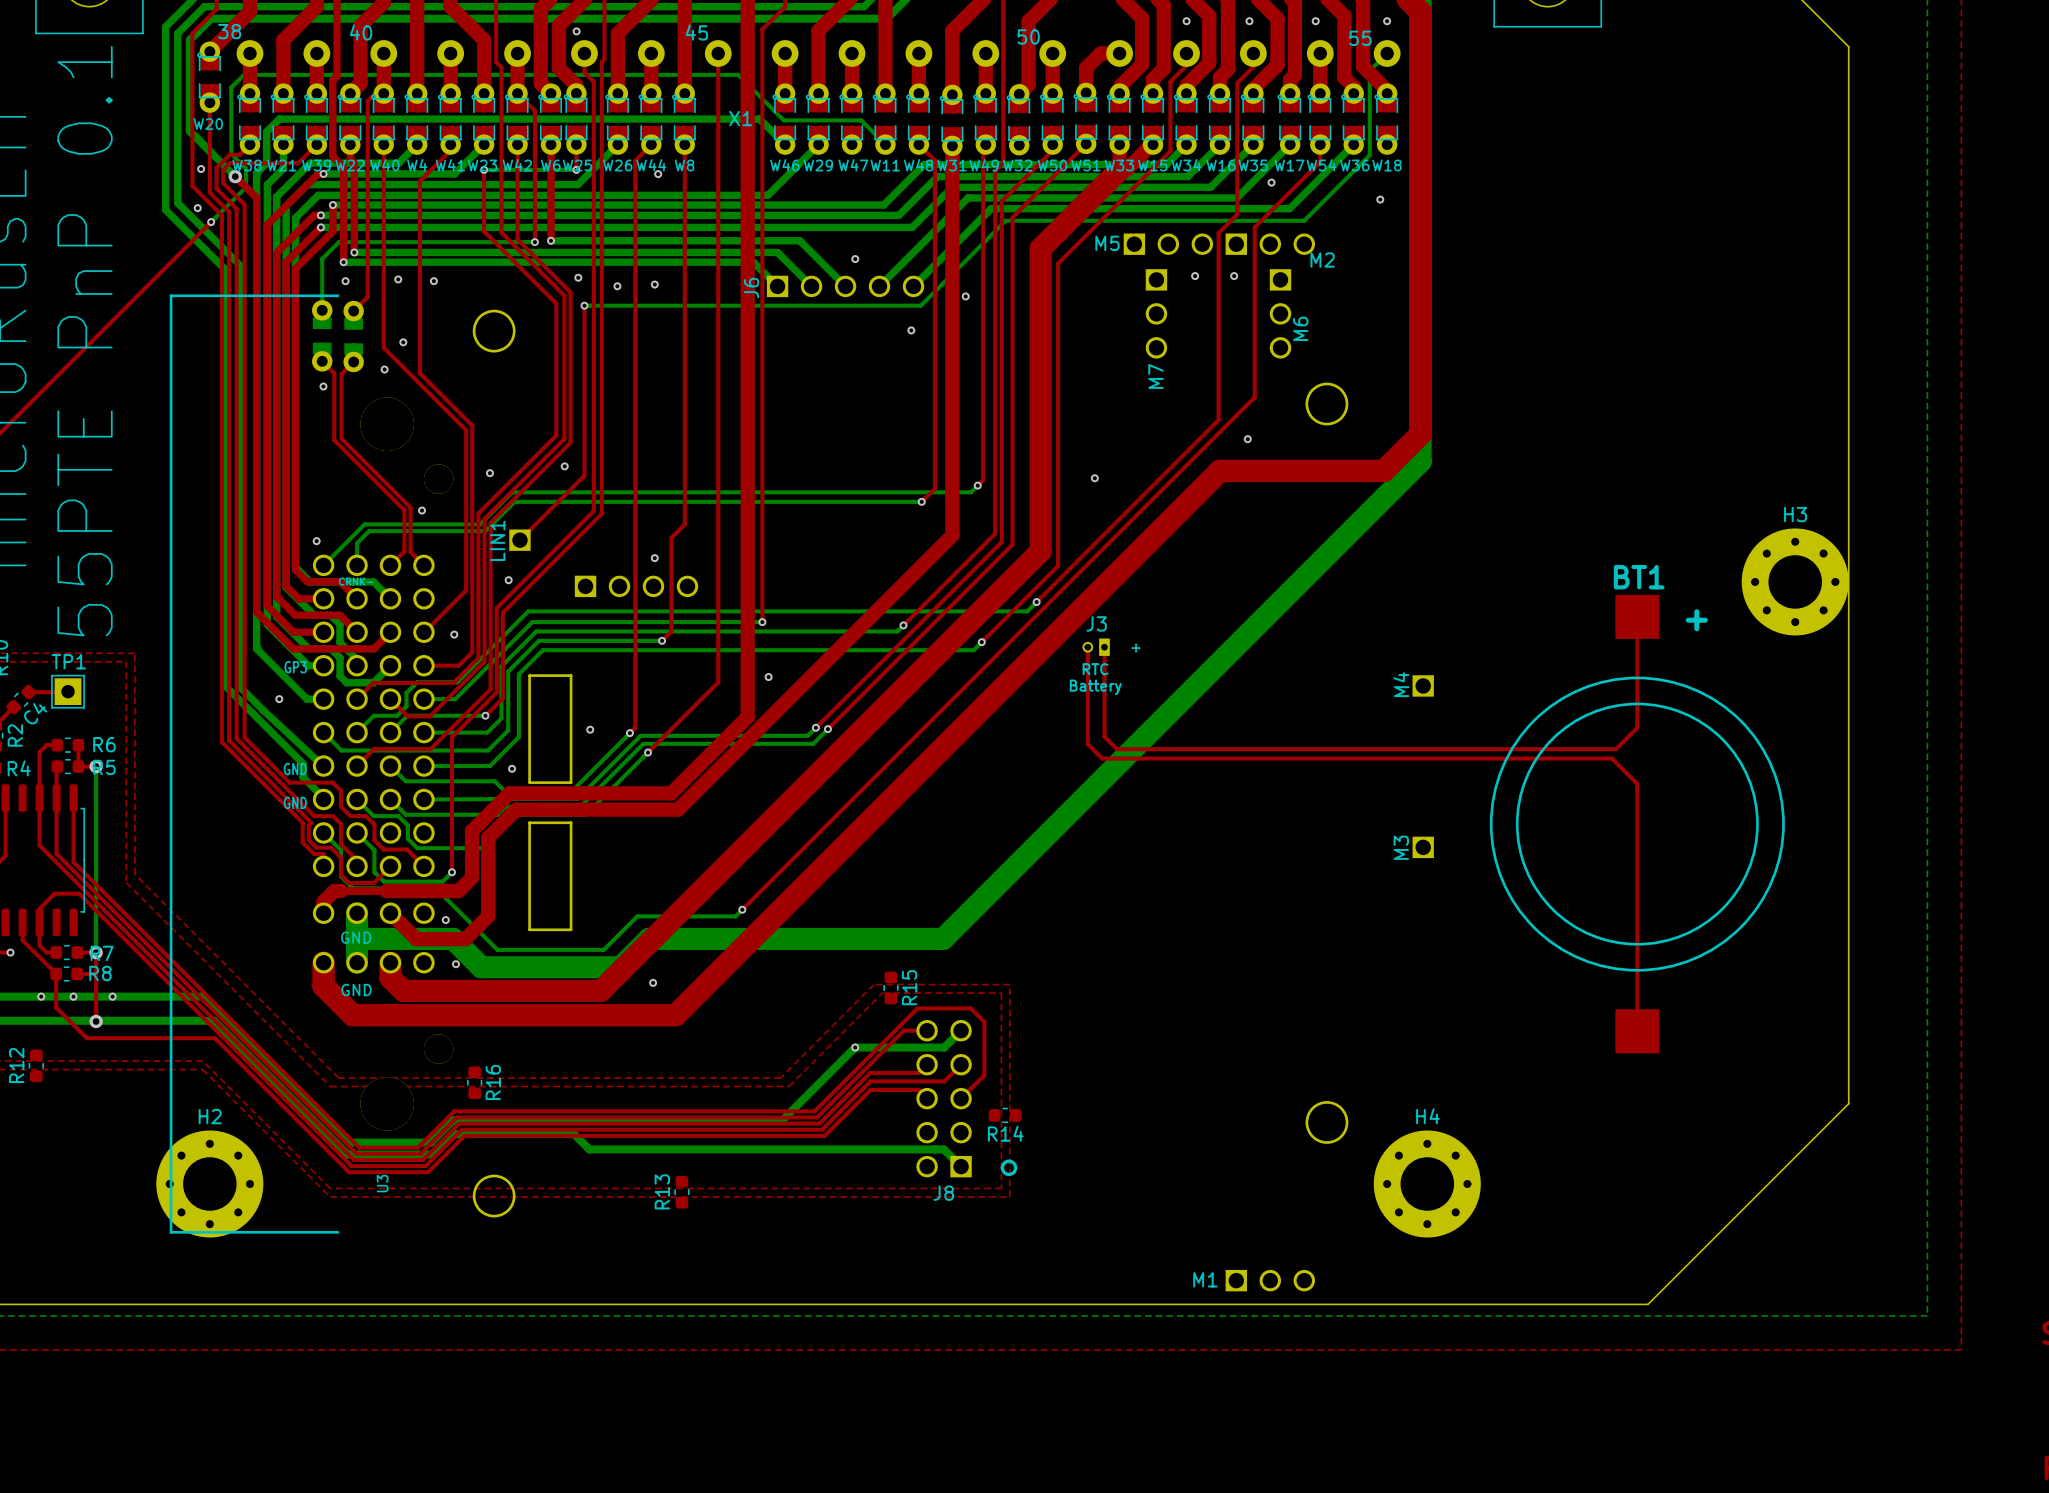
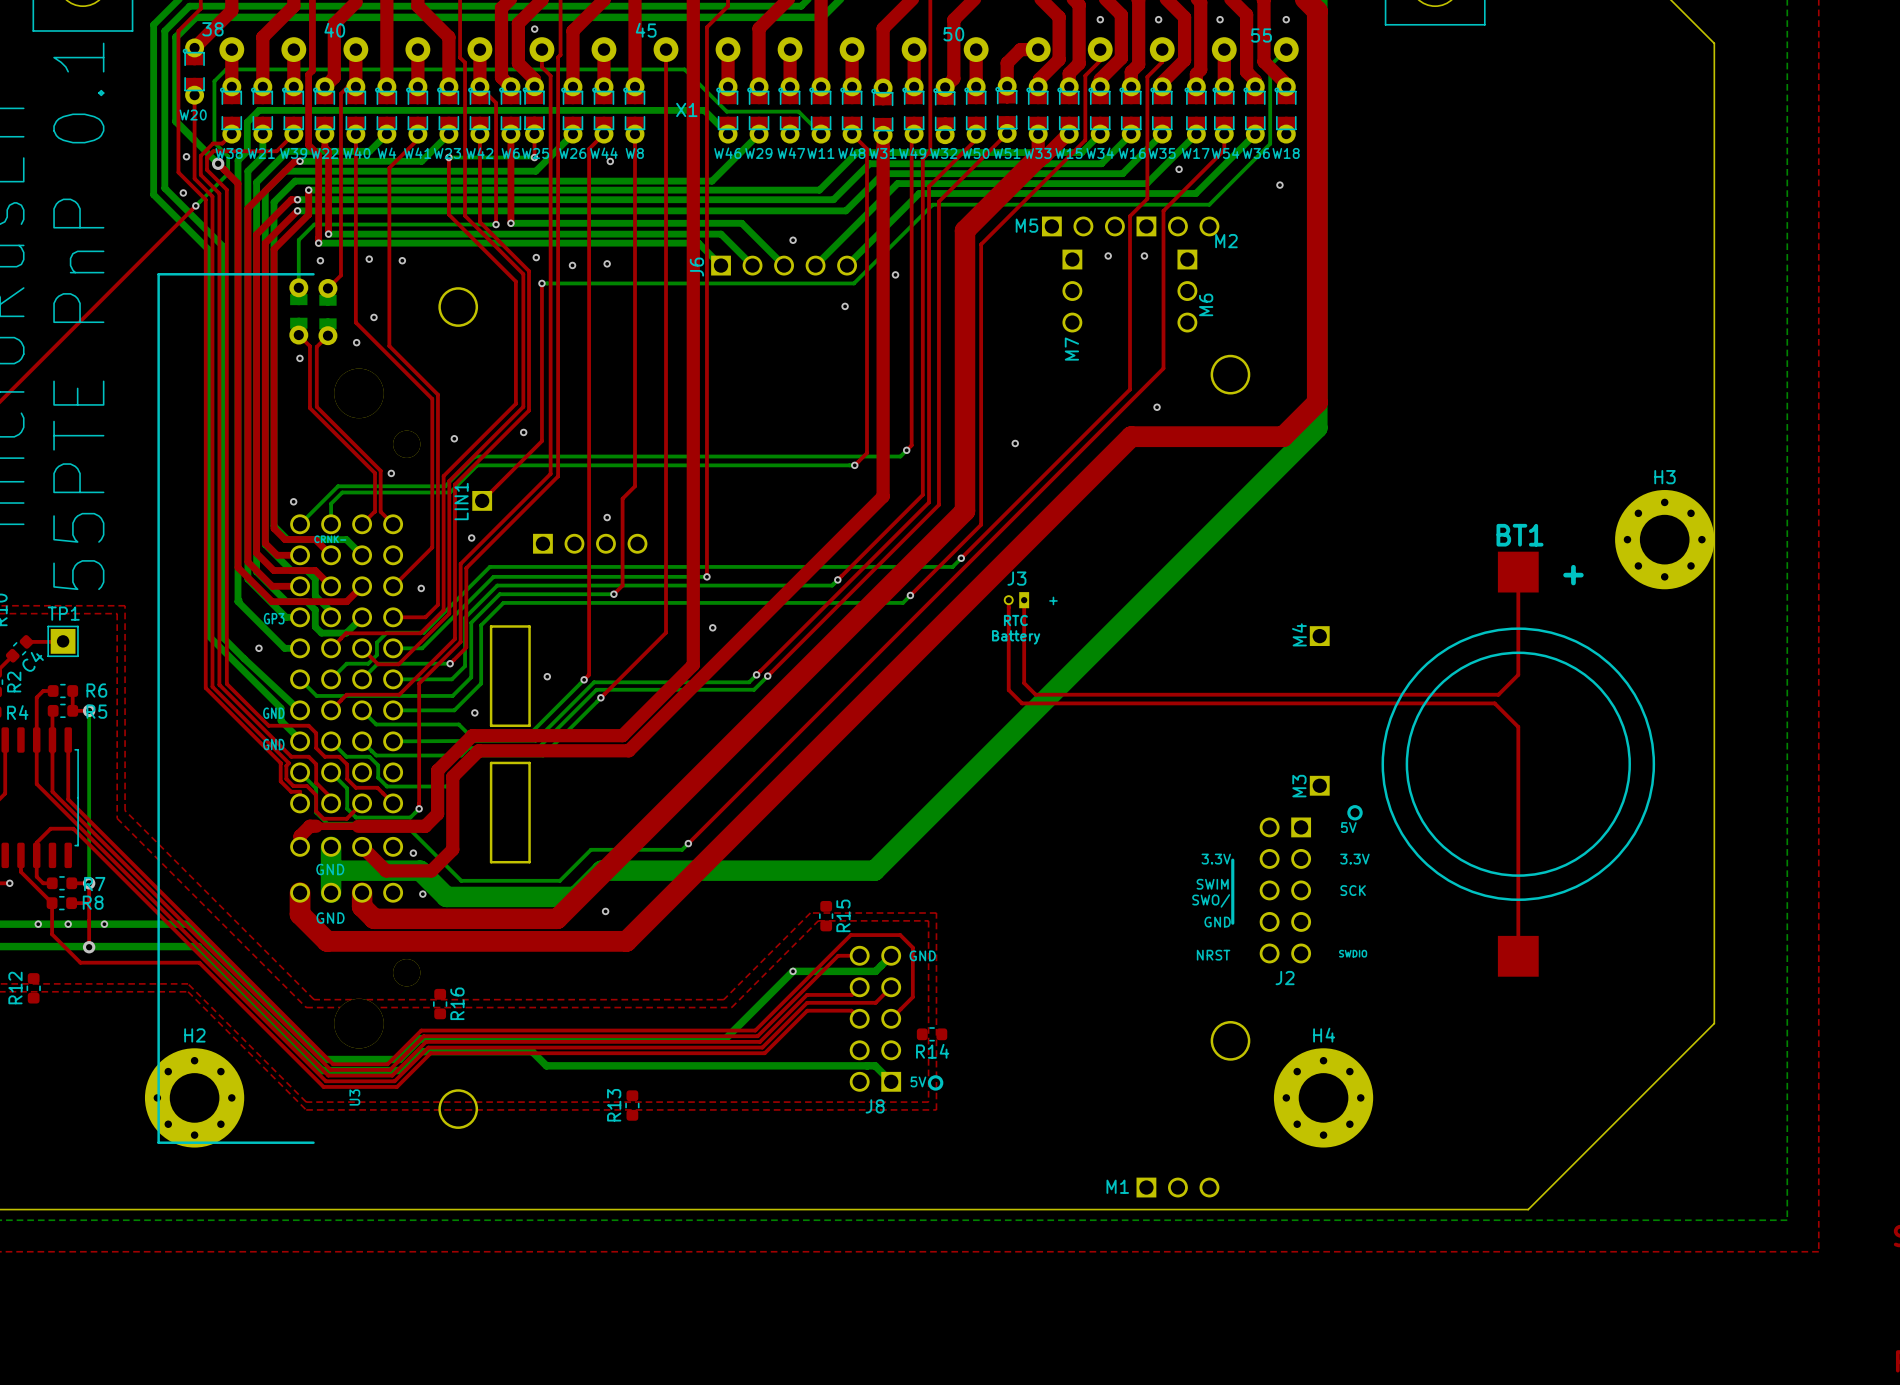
U3 footprint: [169, 233, 1434, 1292] -> [157, 216, 1363, 1198]

